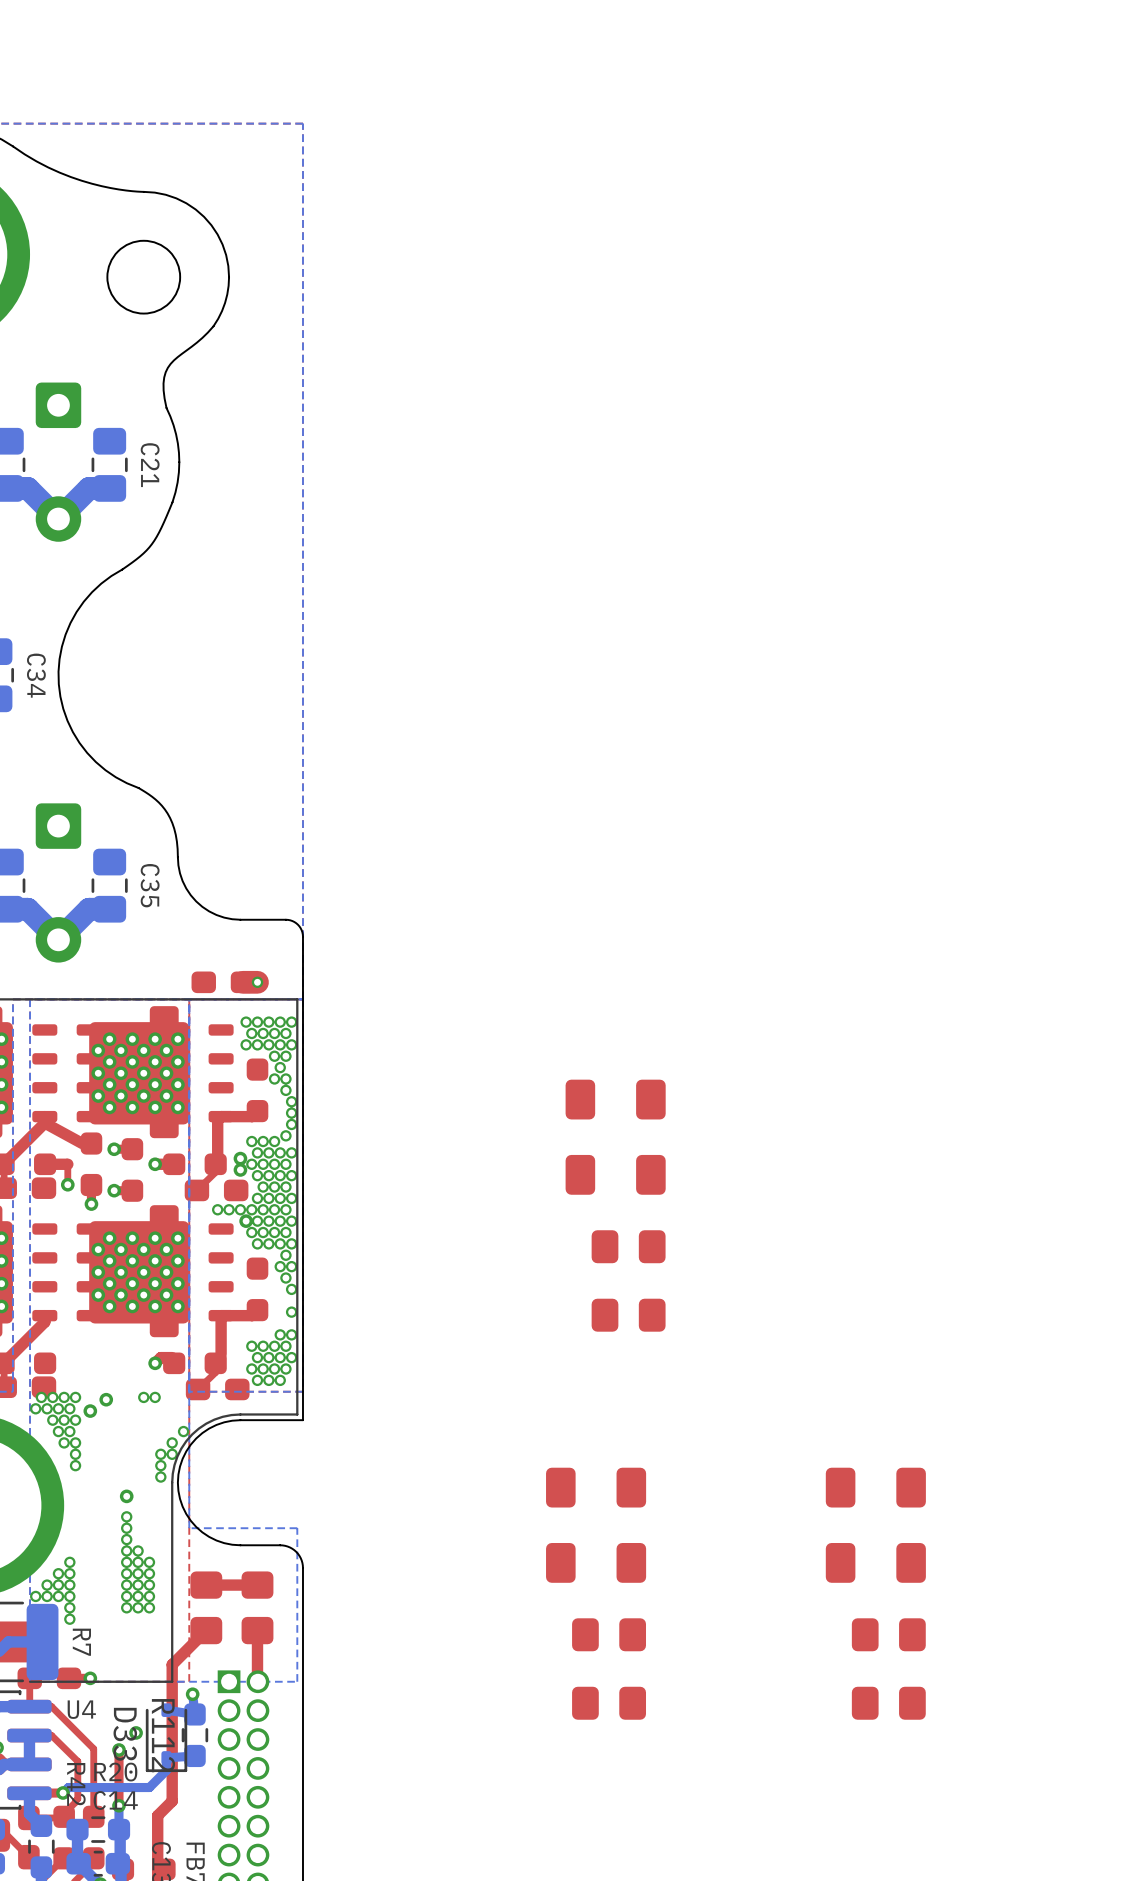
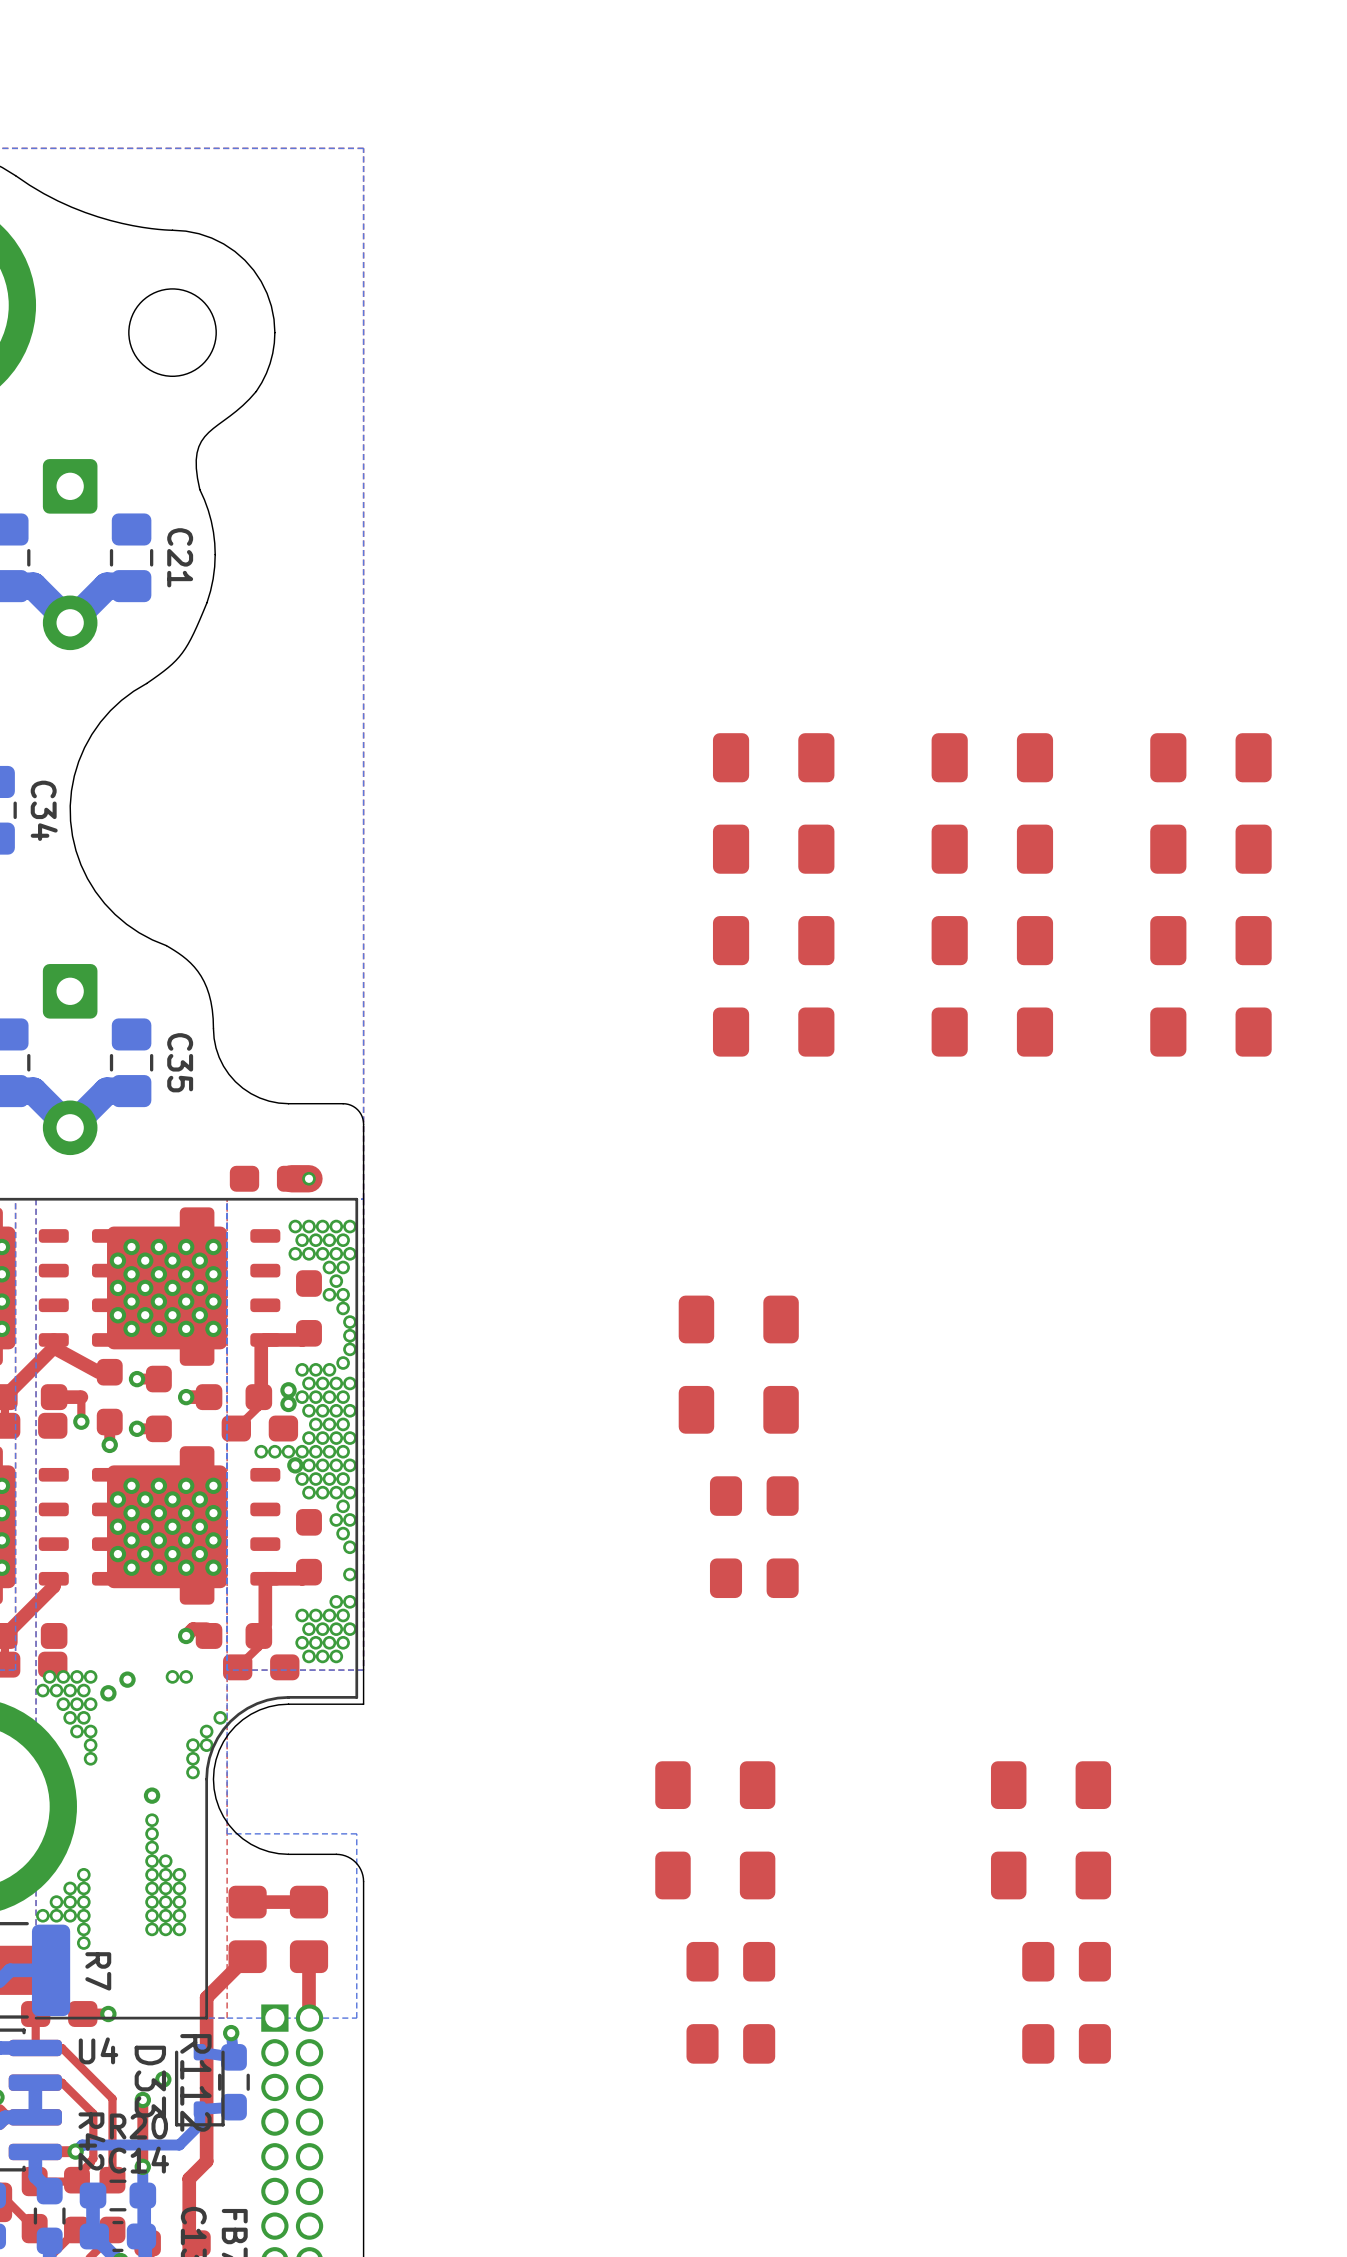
part: none -> (773, 757)
part: none -> (992, 757)
part: none -> (1210, 757)
part: none -> (773, 849)
part: none -> (992, 849)
part: none -> (1210, 849)
part: none -> (773, 940)
part: none -> (992, 940)
part: none -> (1210, 940)
part: none -> (773, 1032)
part: none -> (992, 1032)
part: none -> (1210, 1032)

